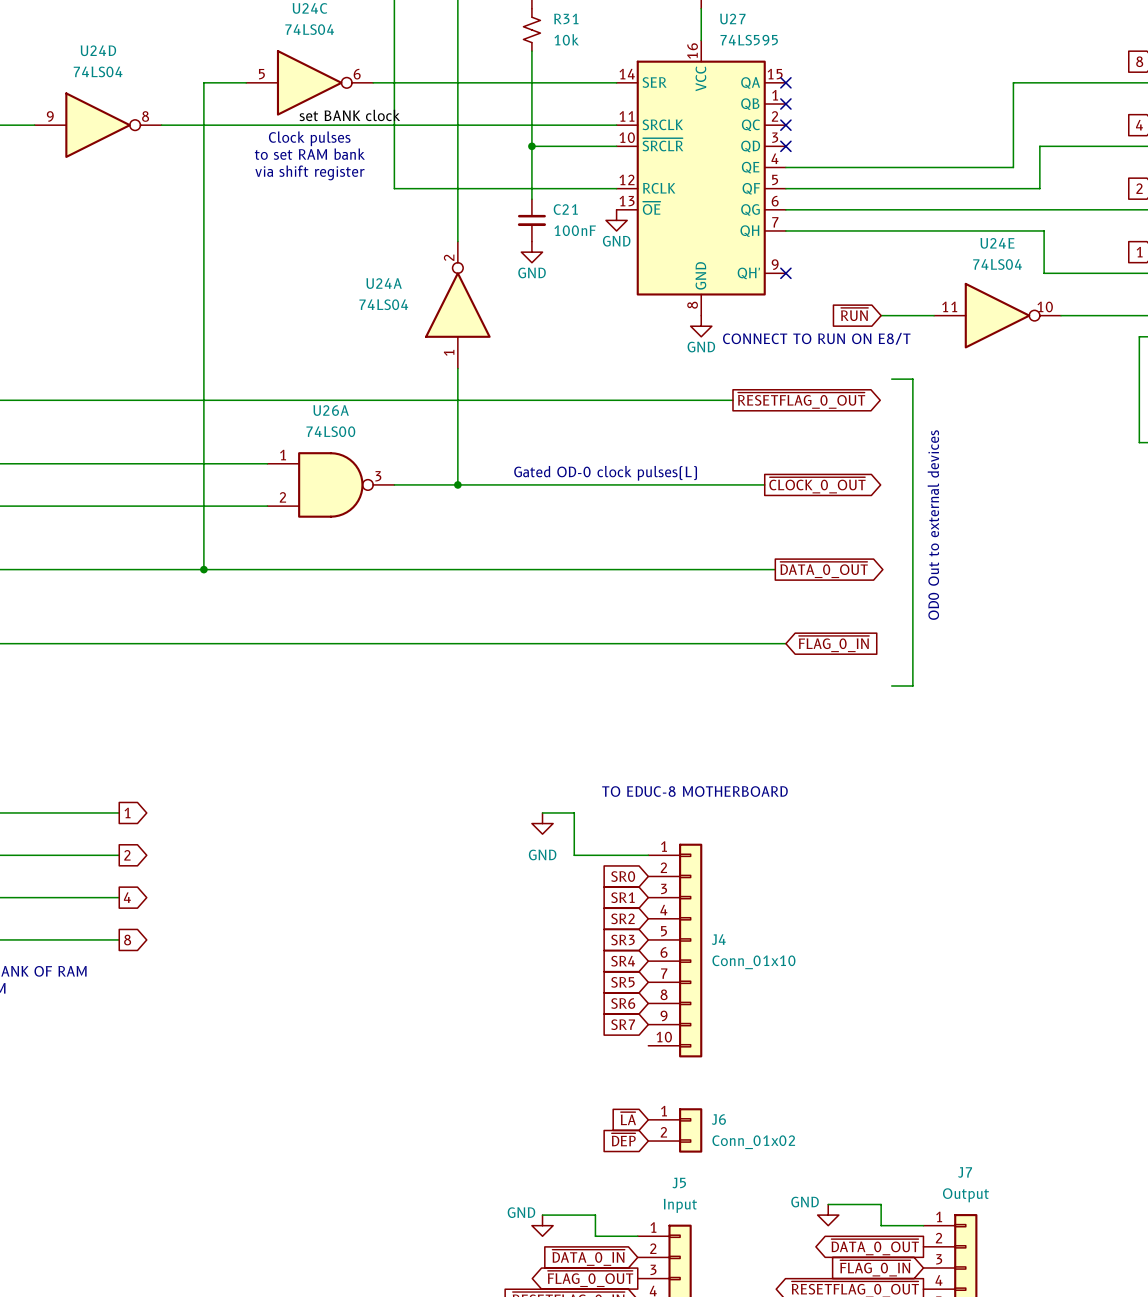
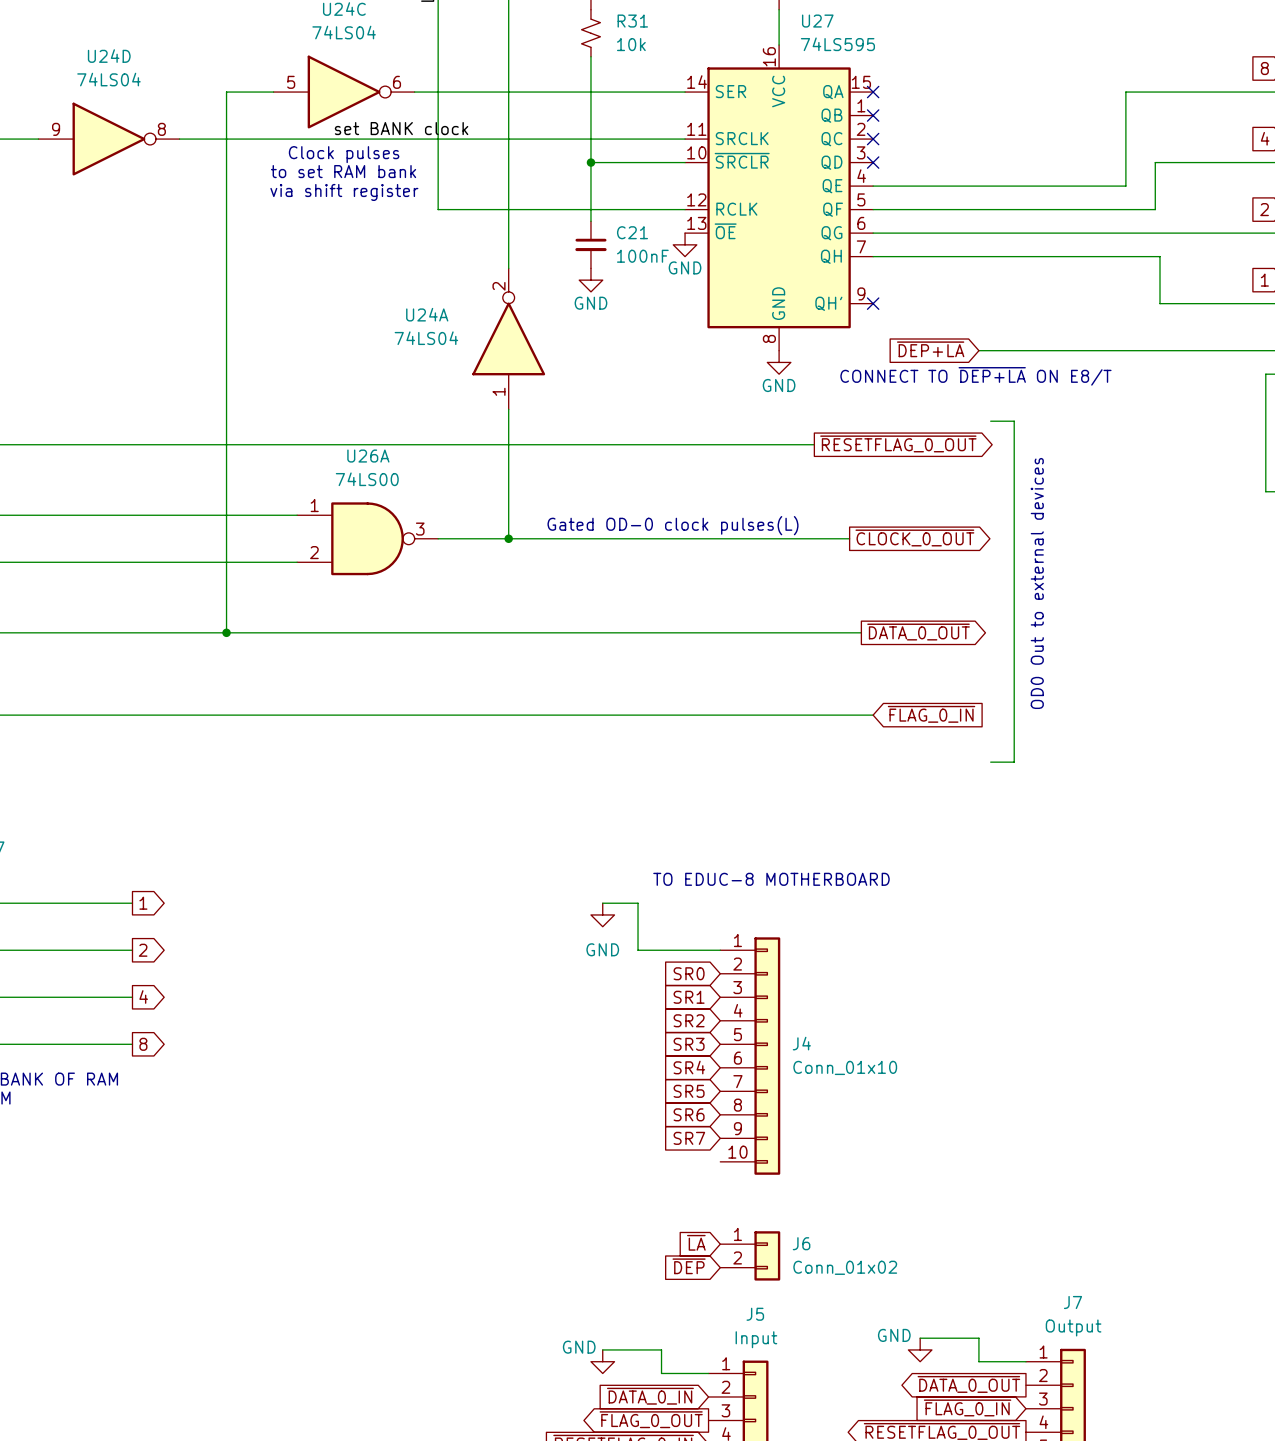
global label: ~{RUN} (854, 314) -> ~{DEP+LA} (930, 349)
U24E: 74LS04 (997, 315) -> none
text: CONNECT TO RUN ON E8/T (816, 338) -> CONNECT TO ~{DEP+LA} ON E8/T (975, 376)

